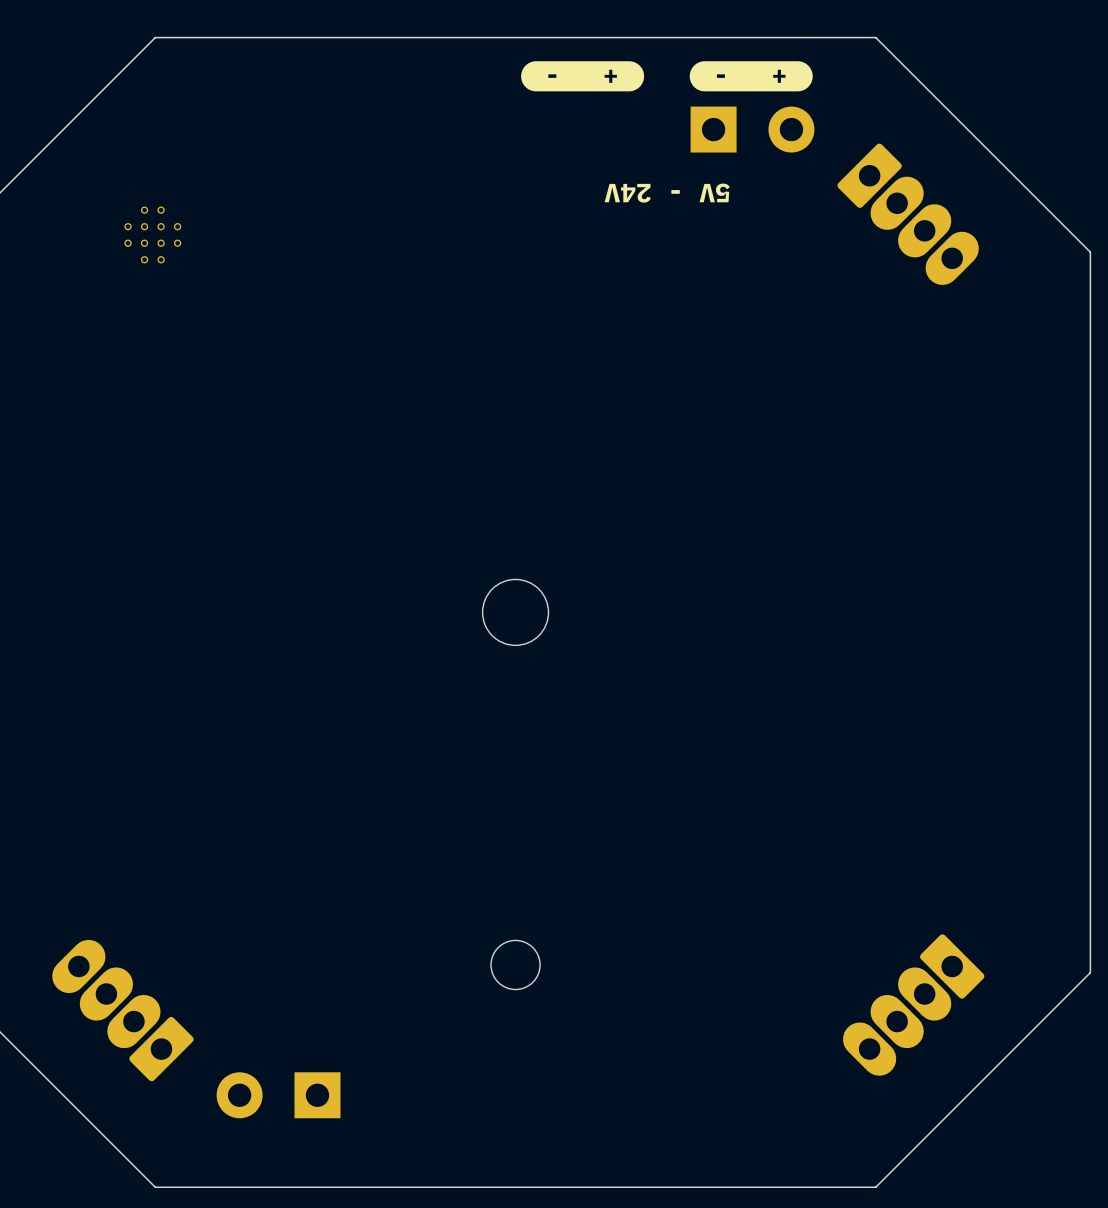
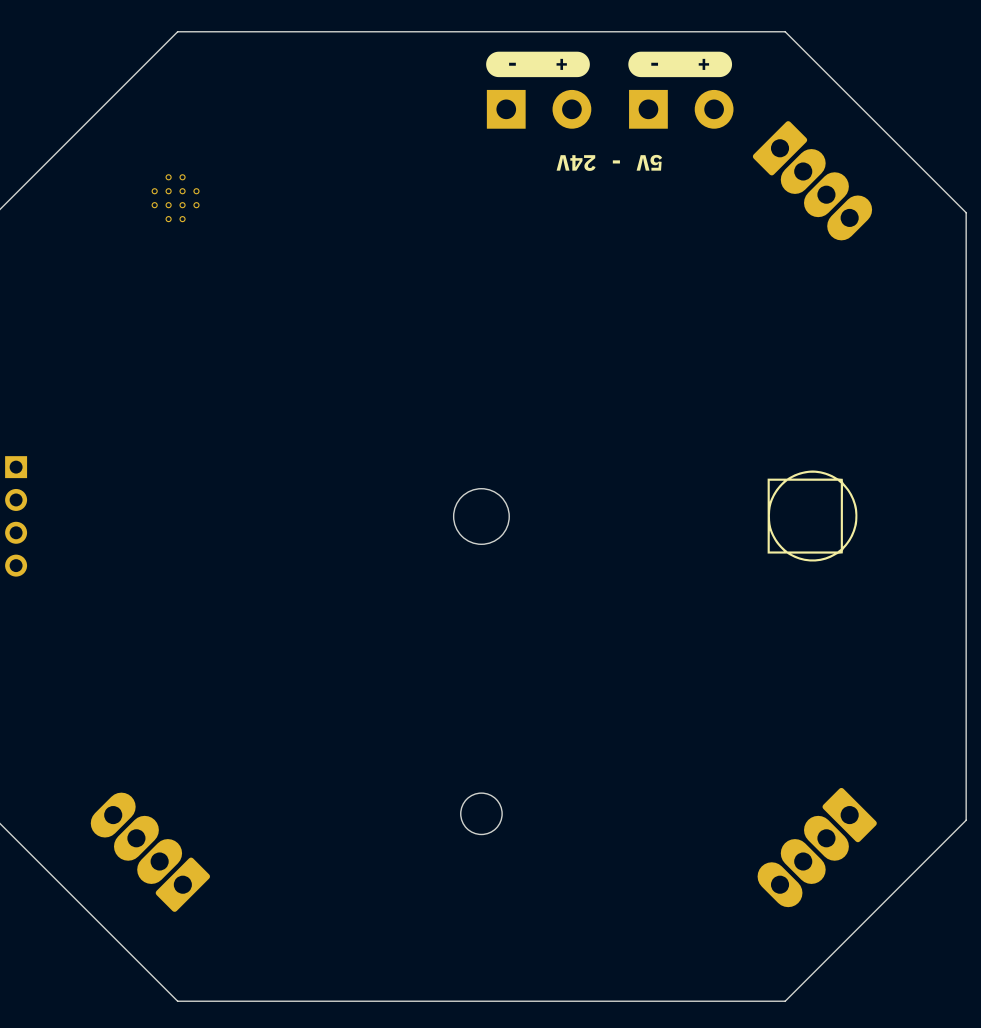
part: none -> (539, 109)
drawing: none -> [767, 470, 858, 562]
part: (278, 1095) -> none

